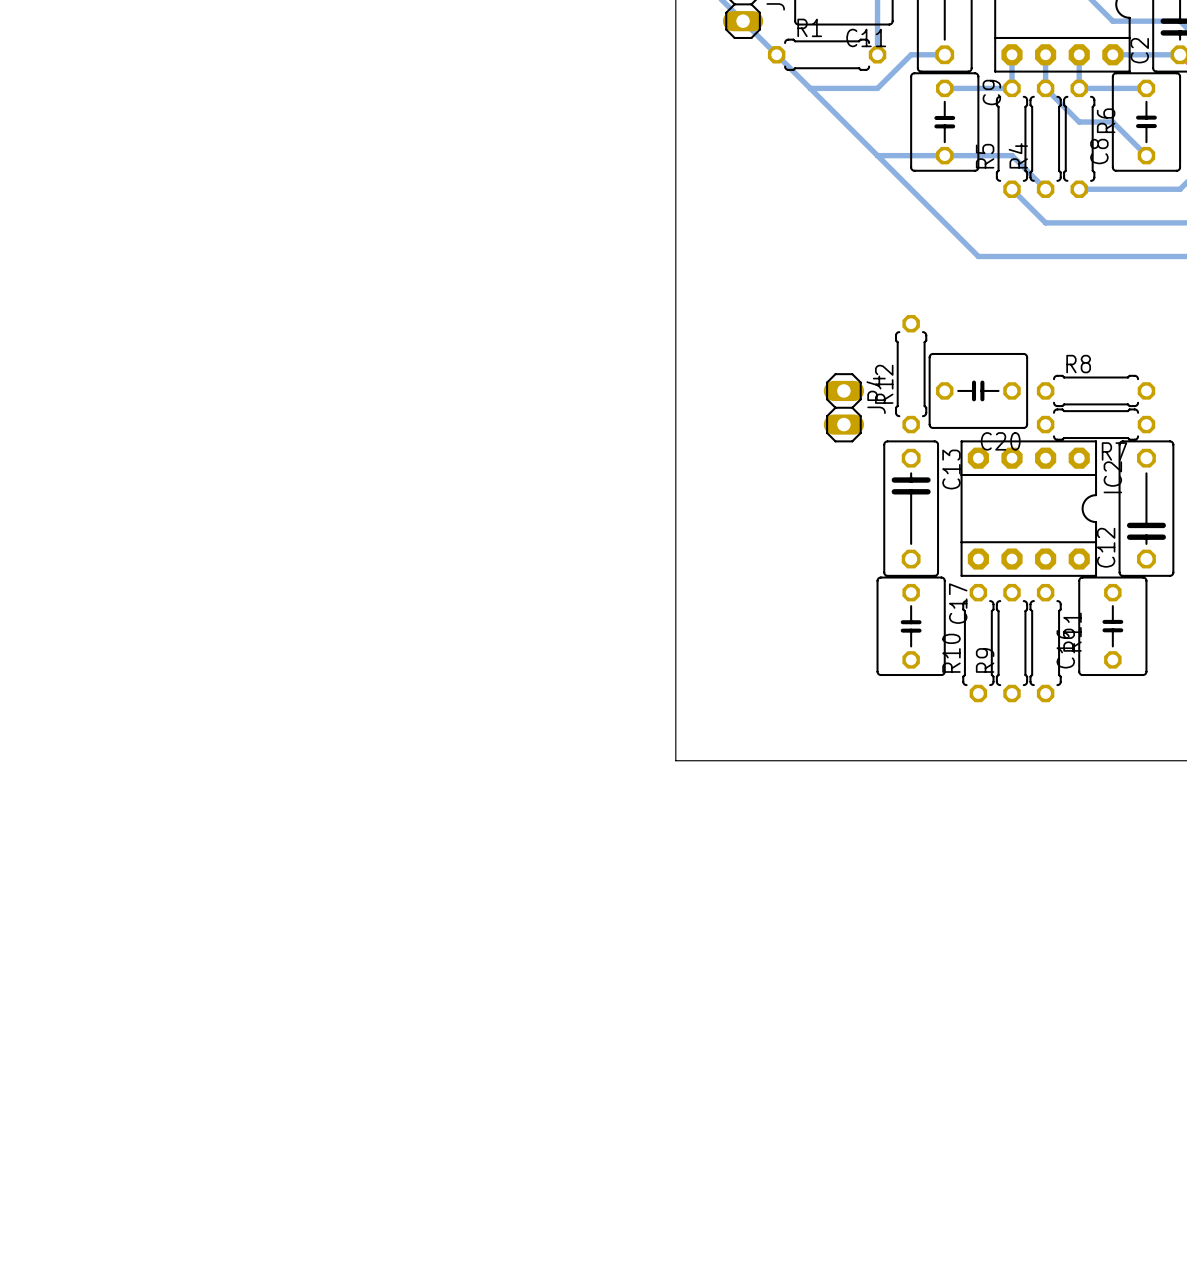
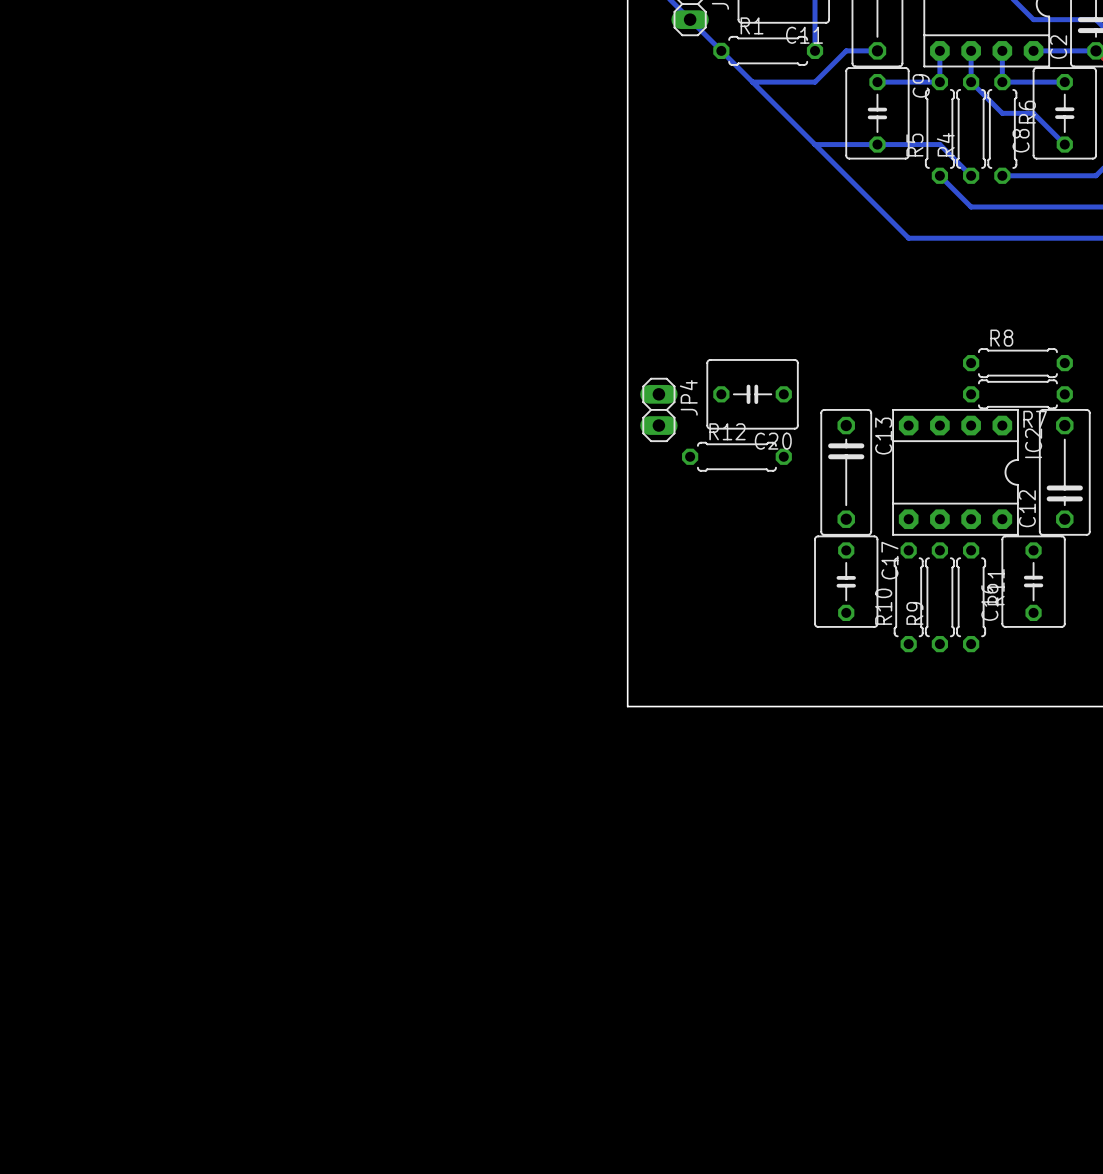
R12 rotation: 0° (911, 374) -> 90° clockwise (736, 456)
R12 position: (911, 374) -> (736, 456)
C20 position: (978, 390) -> (752, 394)
JP4 position: (843, 407) -> (658, 409)

